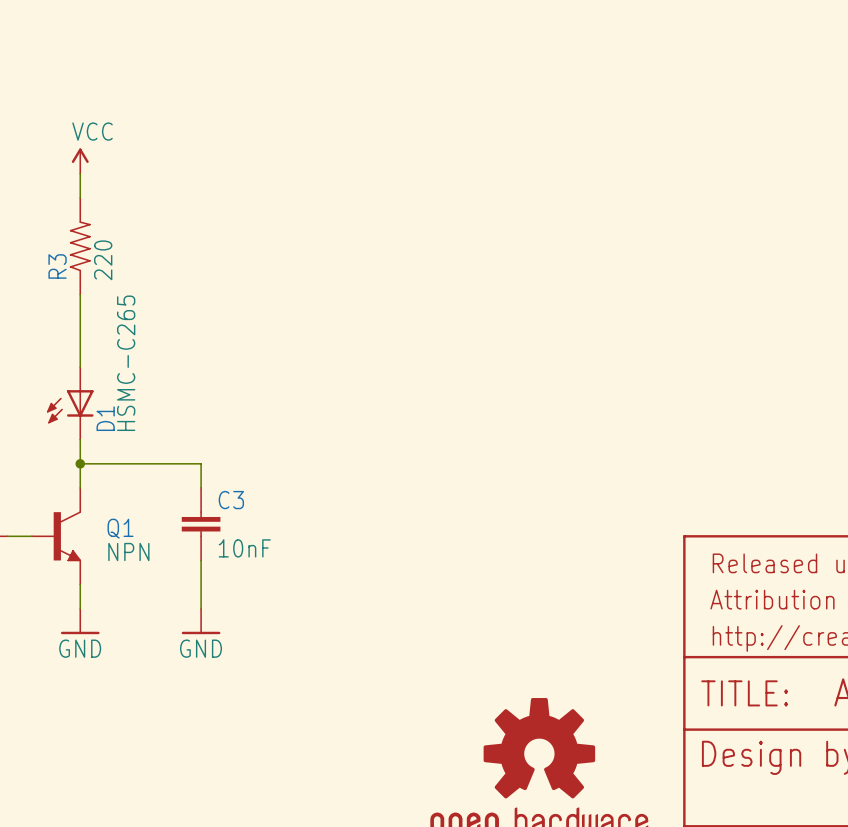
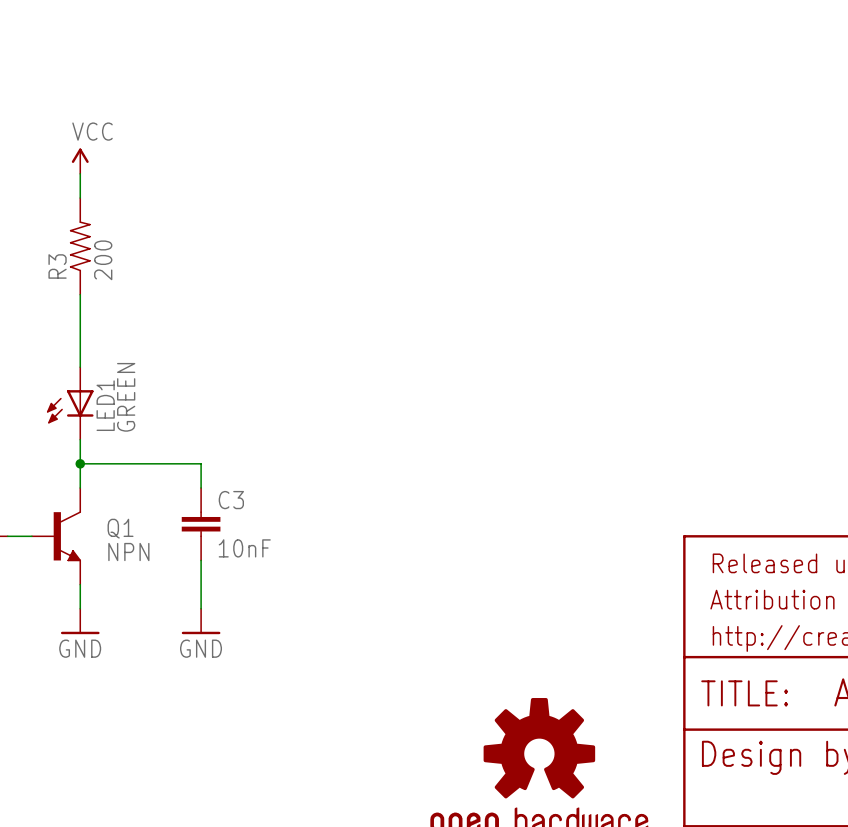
R3 value: 220 (103, 260) -> 200 (103, 260)
D1 value: HSMC-C265 (126, 363) -> GREEN (126, 397)
D1 name: D1 (105, 418) -> LED1 (105, 405)

